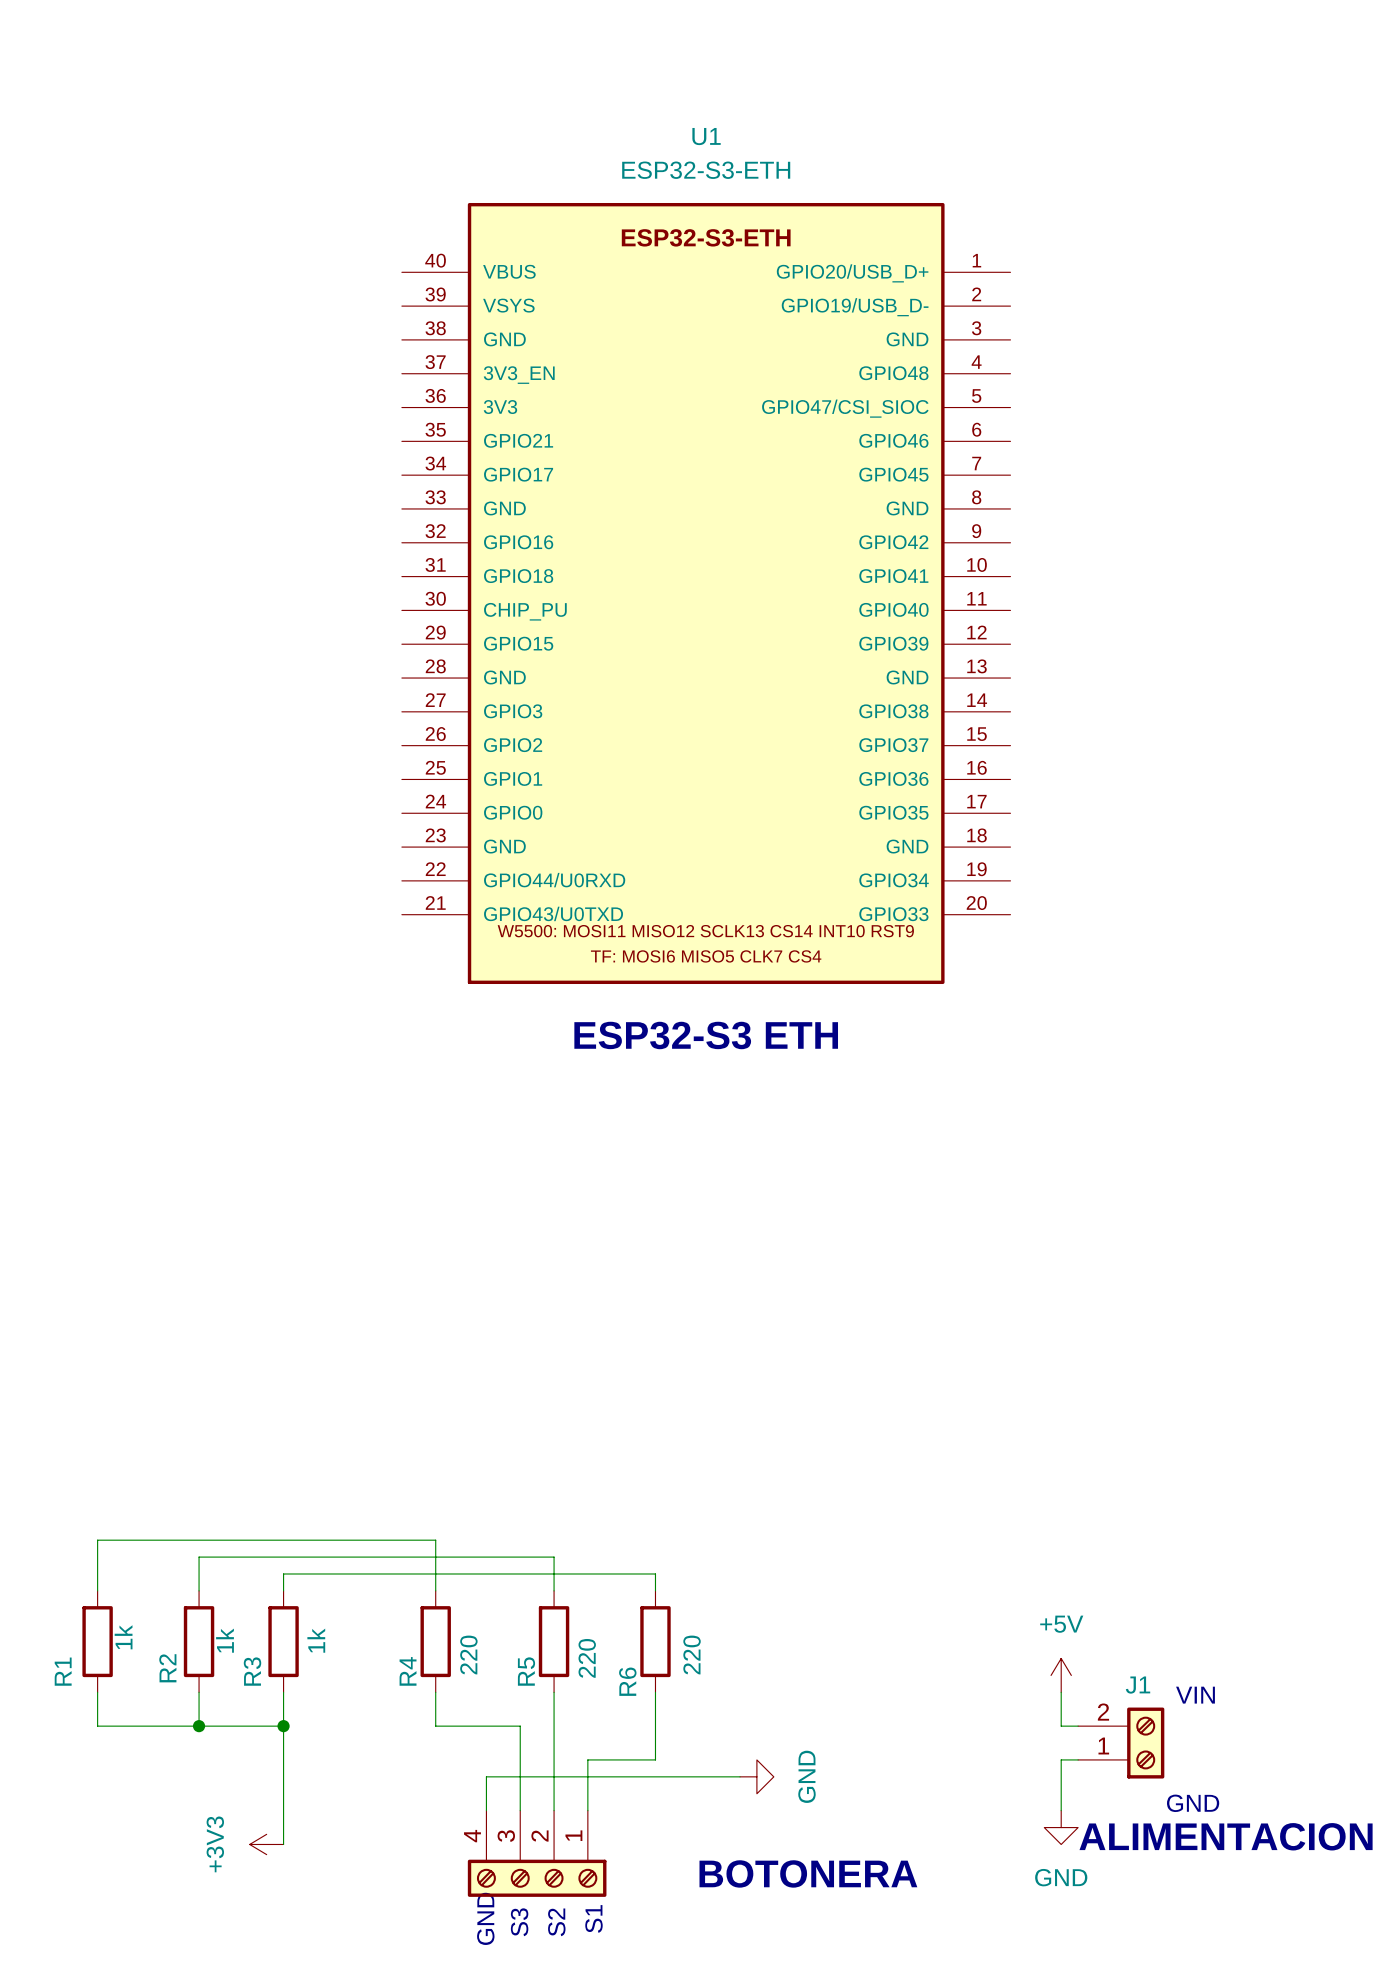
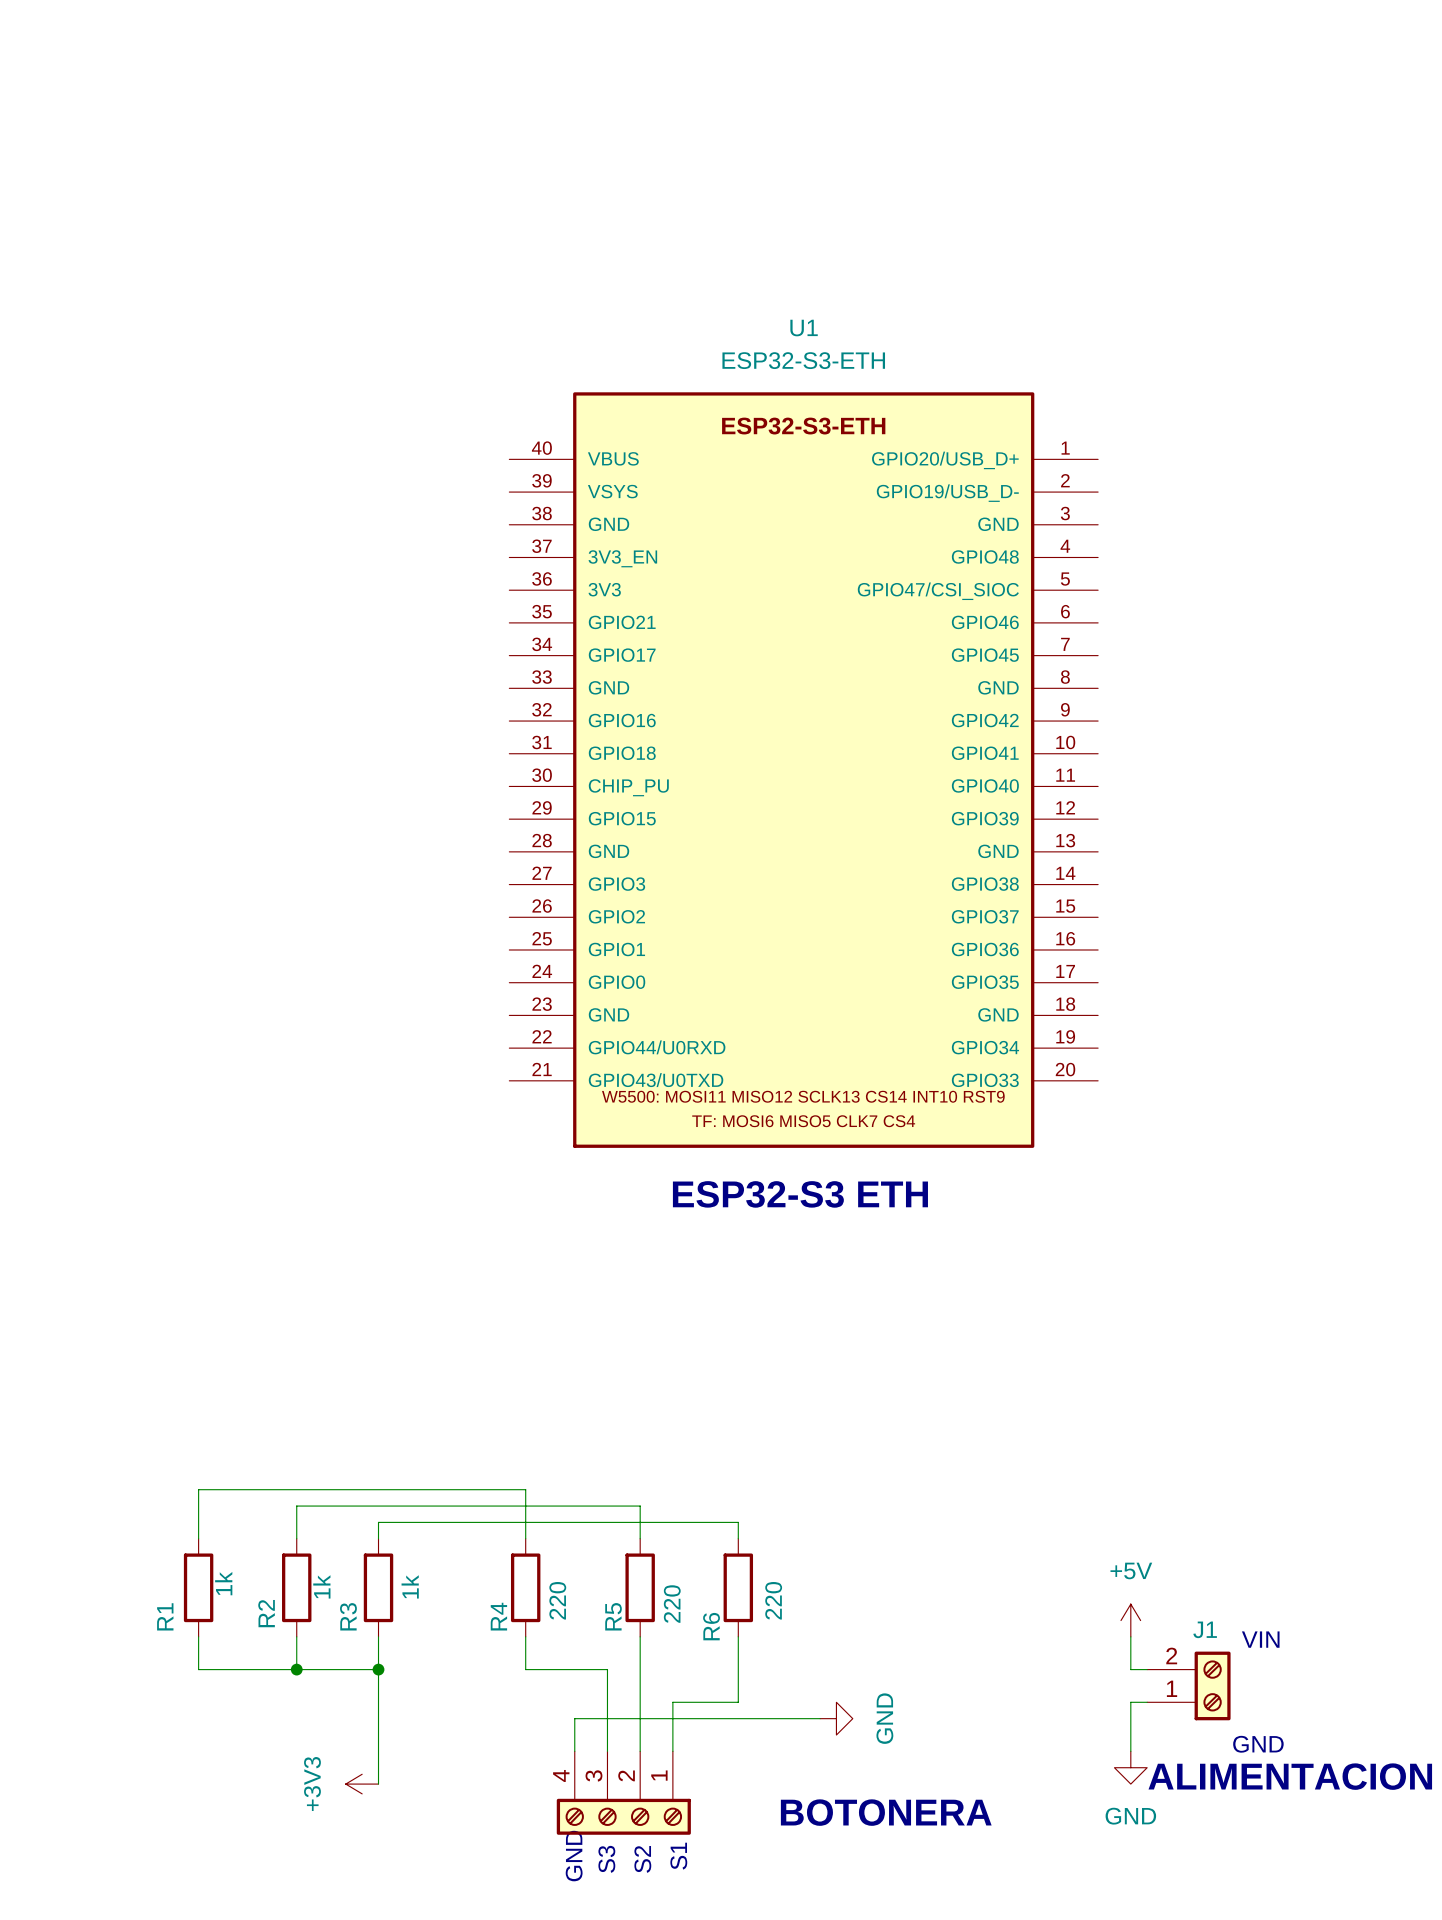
U1 position: (706, 593) -> (803, 770)
text position: ESP32-S3 ETH (706, 1035) -> ESP32-S3 ETH (800, 1194)

